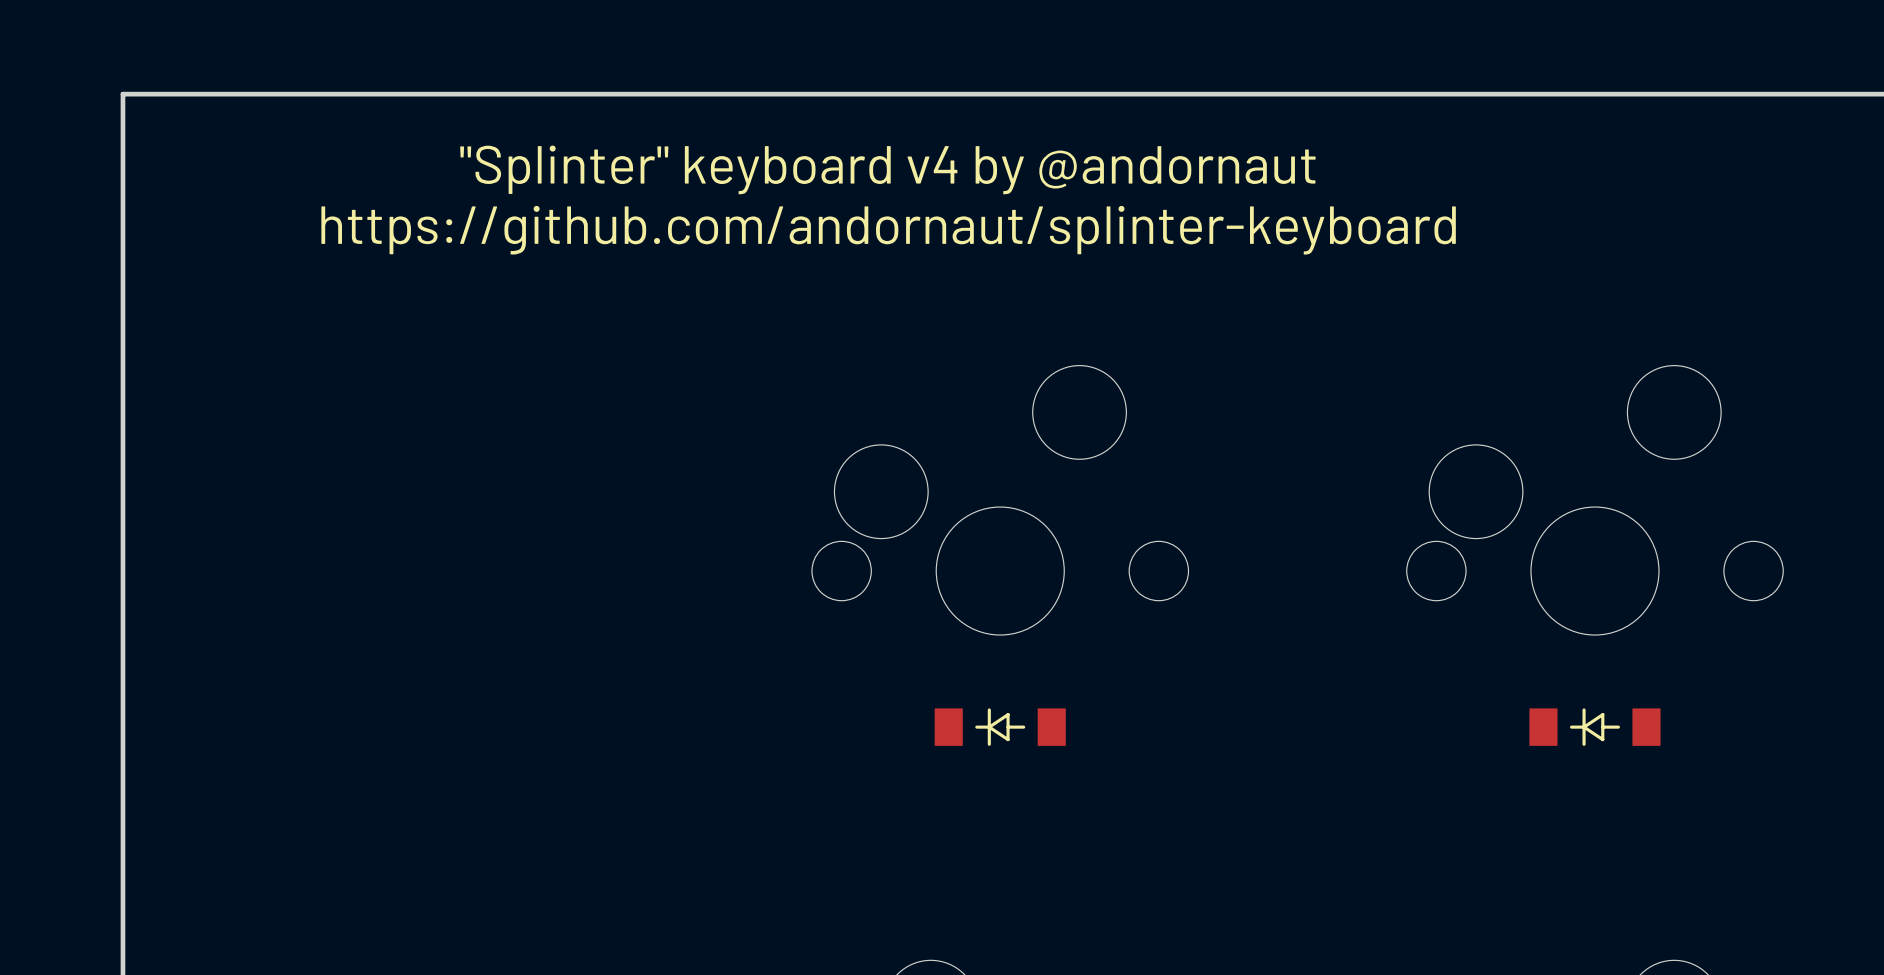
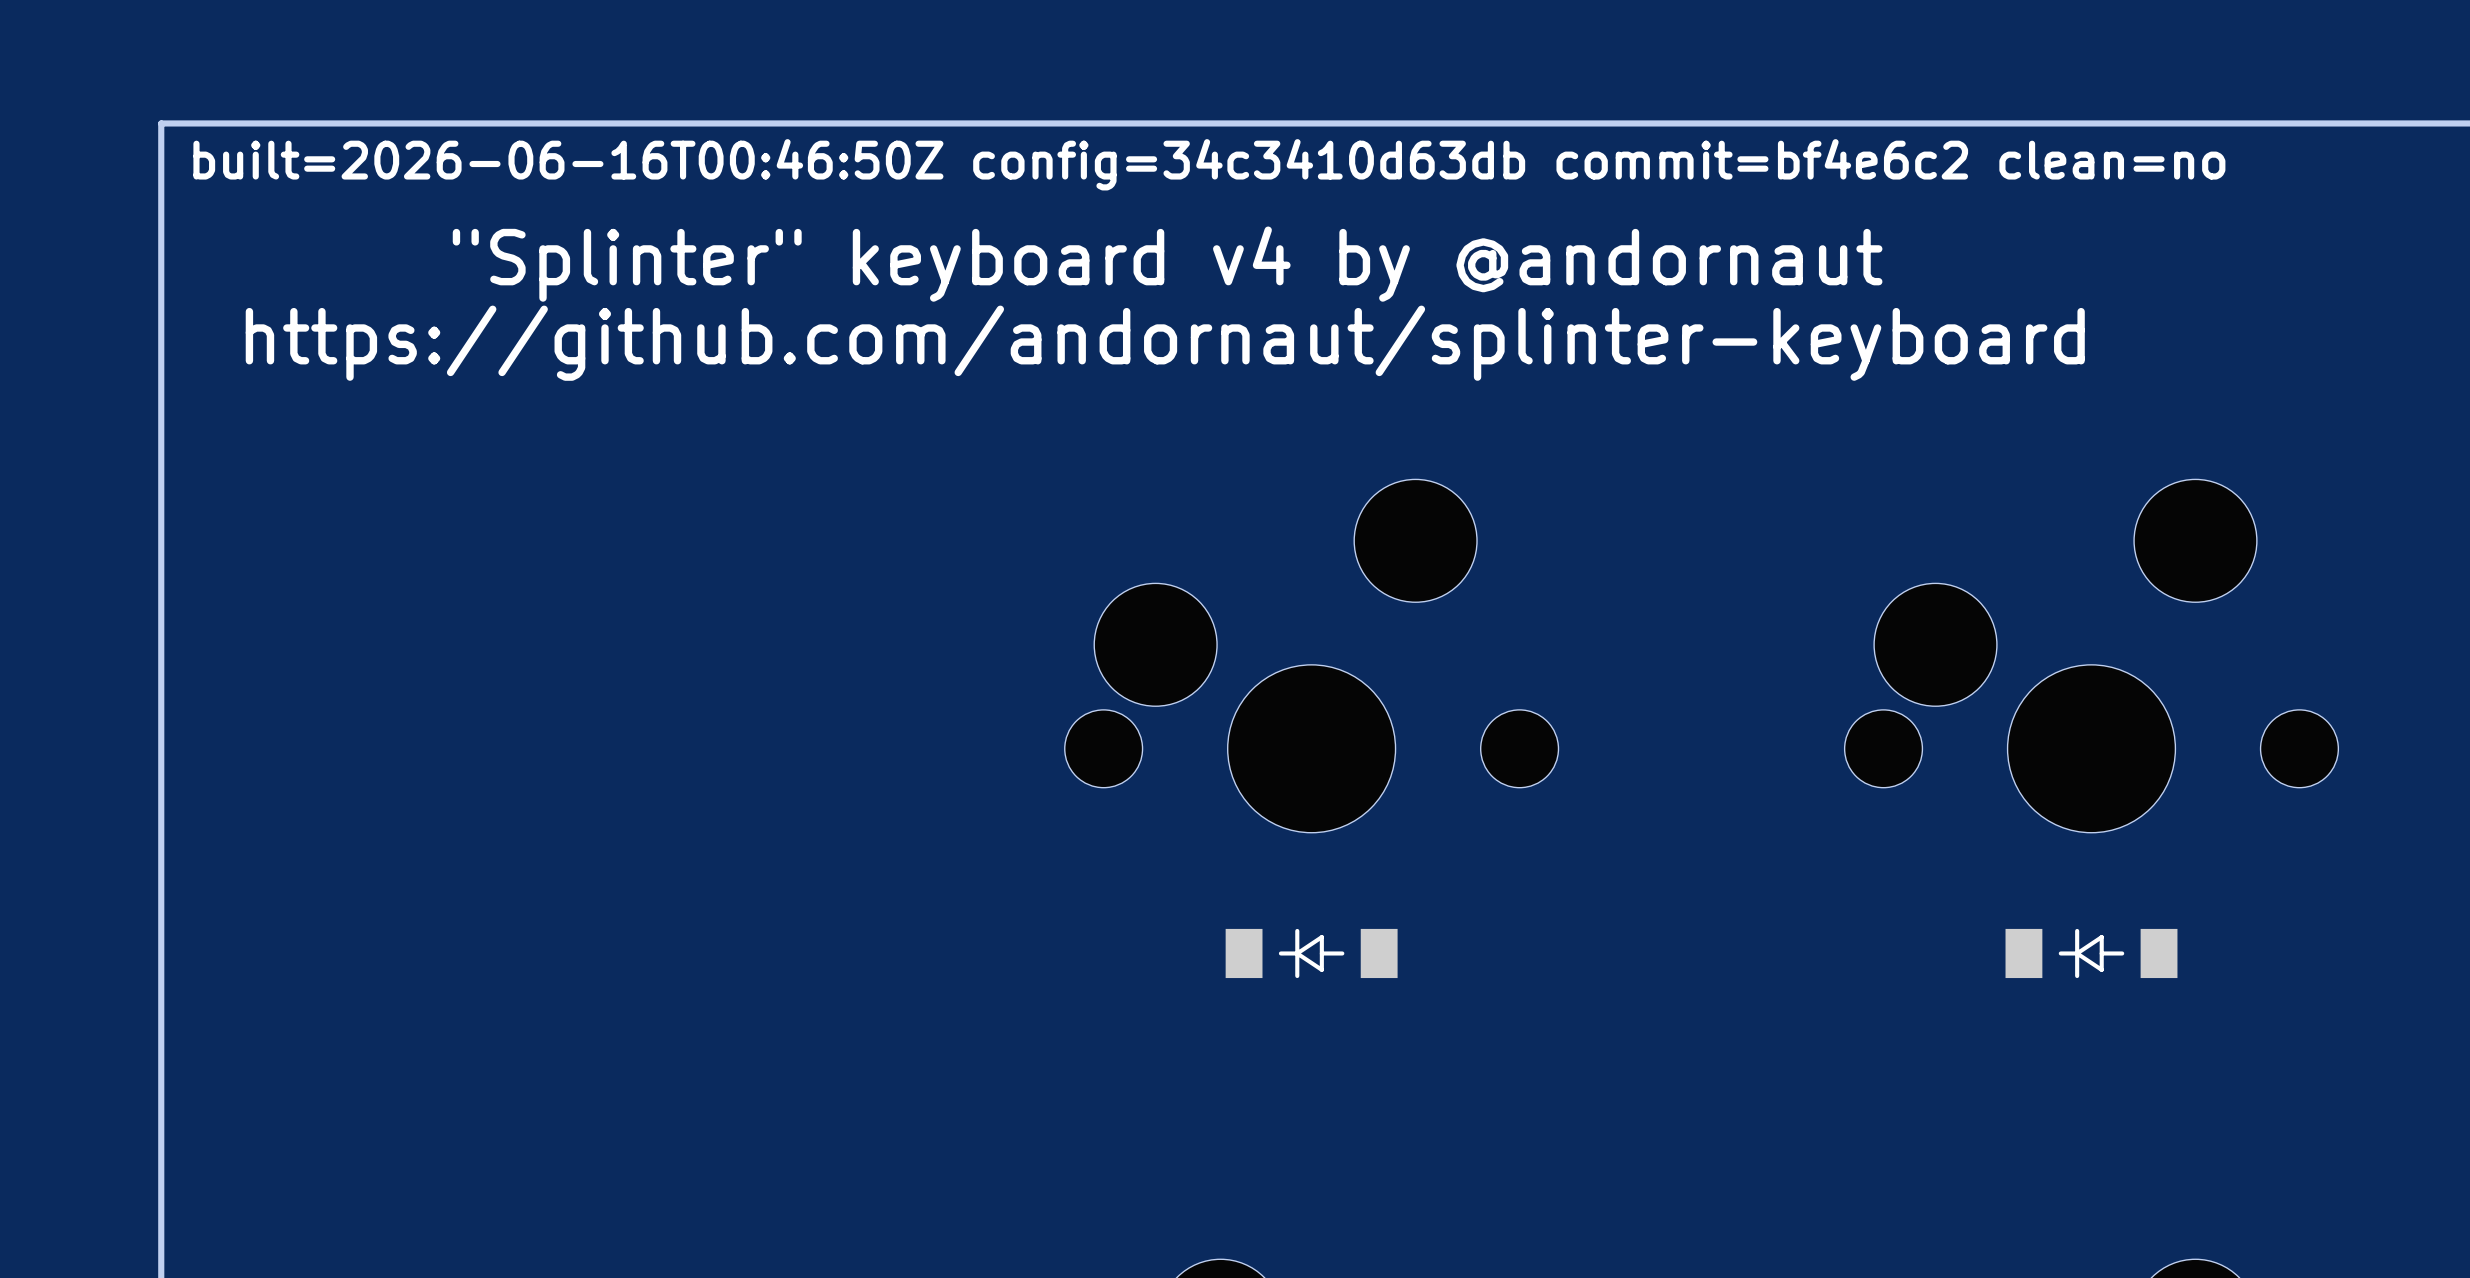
text: none -> built=2026-06-16T00:46:50Z config=34c3410d63db commit=bf4e6c2 clean=no (1209, 164)
text position: "Splinter" keyboard v4 by @andornaut (887, 169) -> "Splinter" keyboard v4 by @andornaut (1167, 264)
text position: https://github.com/andornaut/splinter-keyboard (888, 230) -> https://github.com/andornaut/splinter-keyboard (1165, 343)

